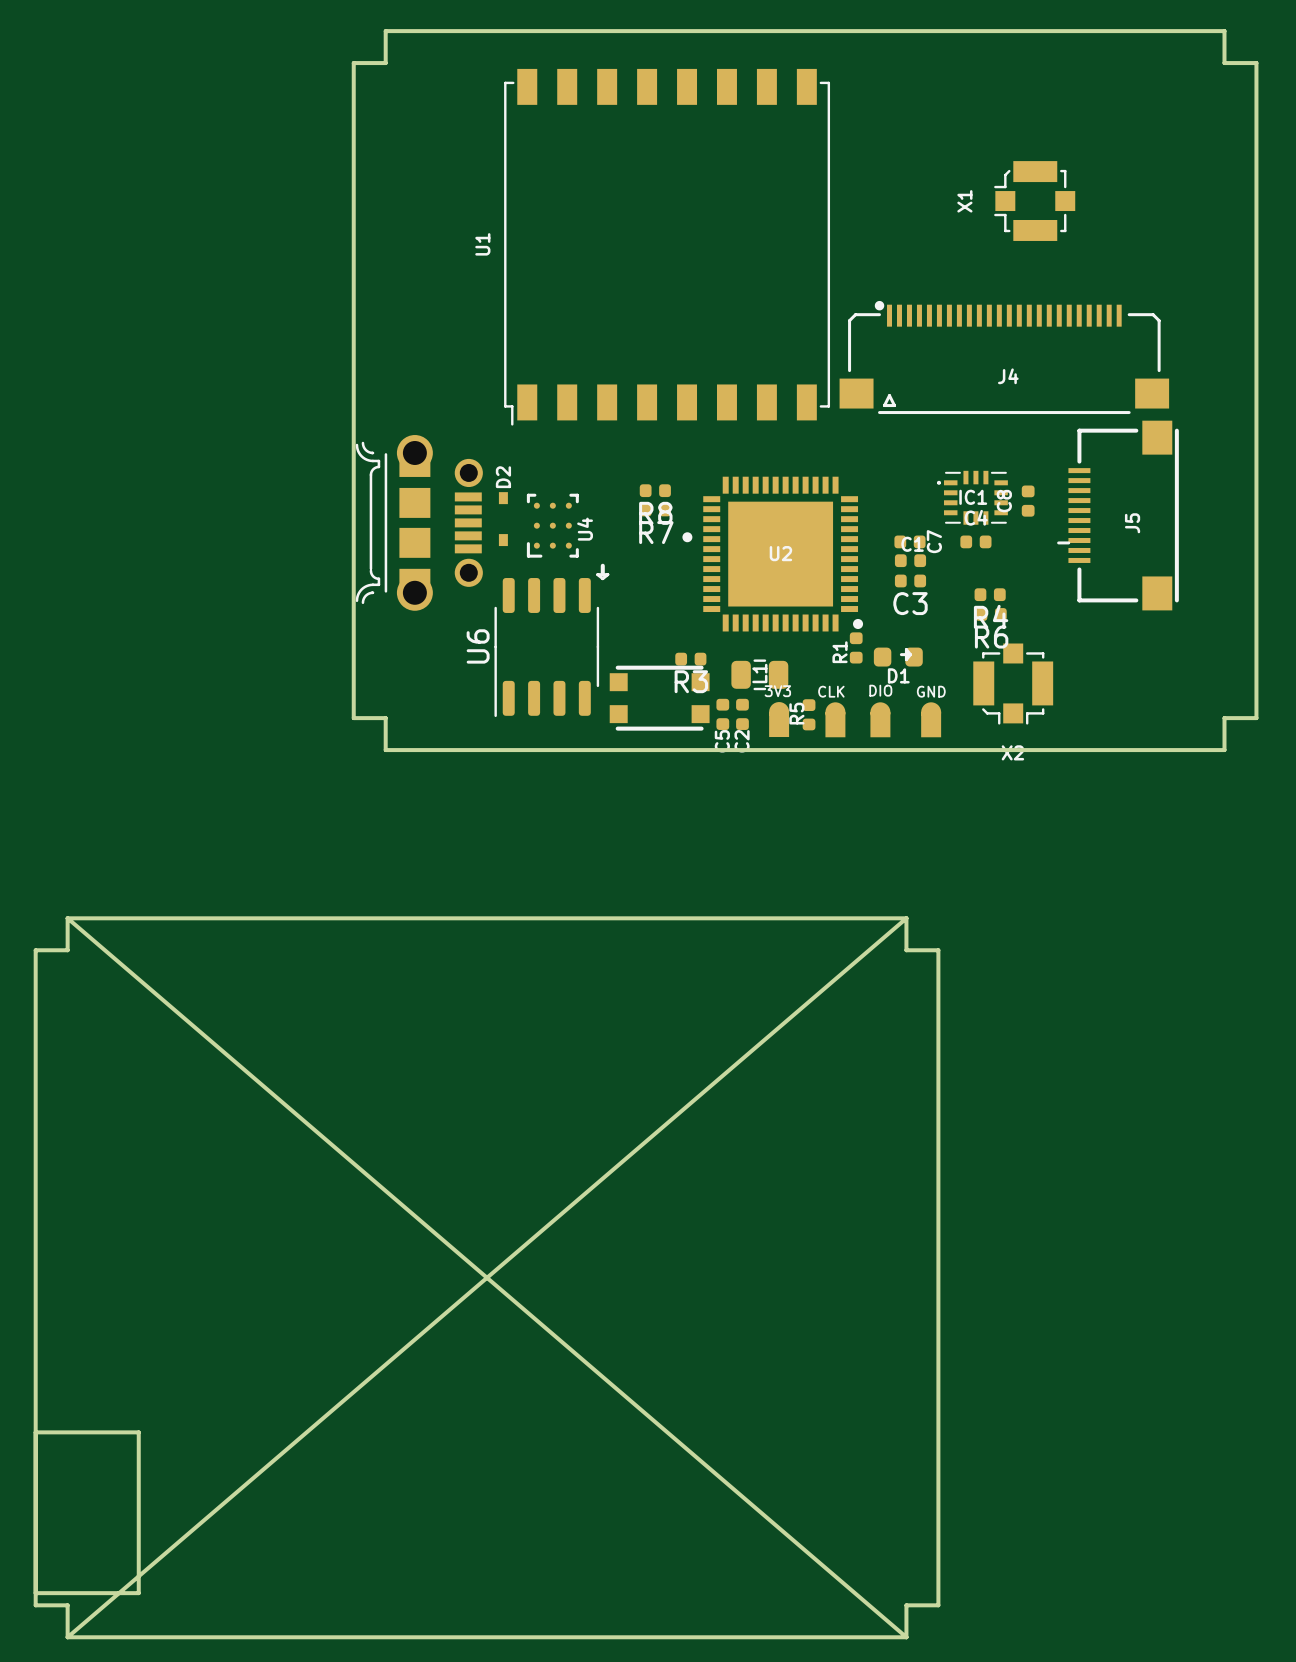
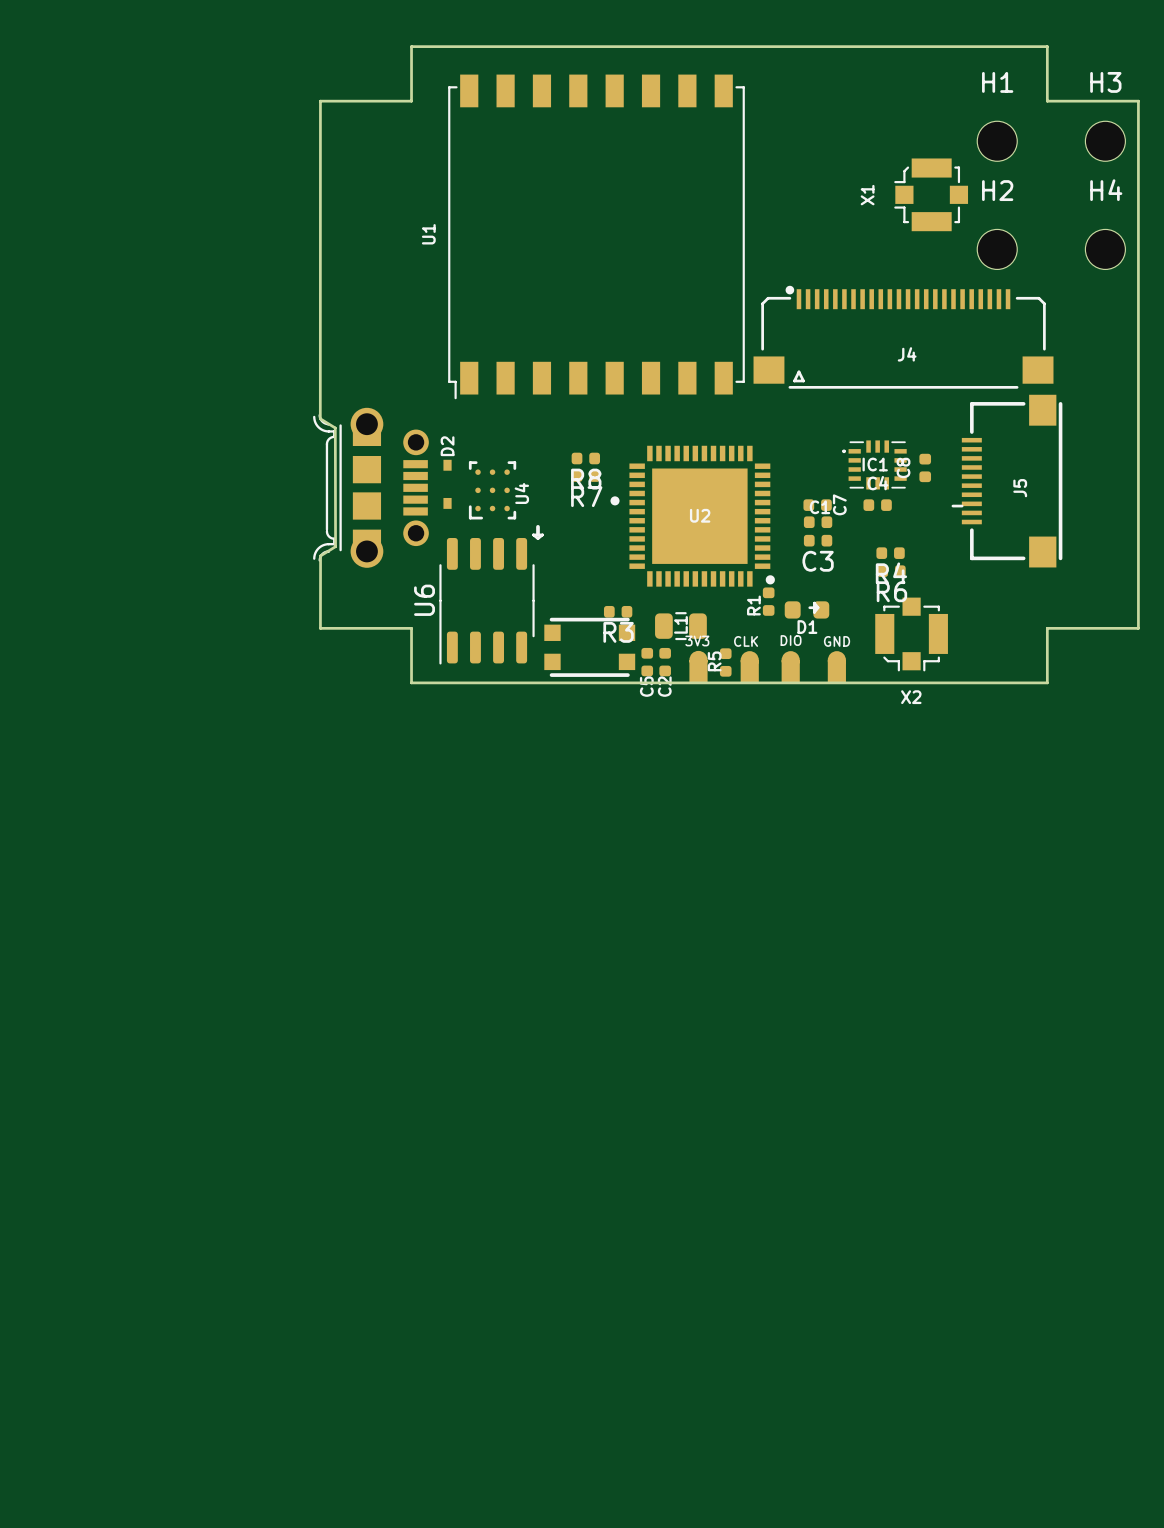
board edge: (385, 31) (385, 63) (353, 63) (353, 718) (385, 718) (385, 750) (1224, 750) (1224, 718) (1256, 718) (1256, 63) (1224, 63) (1224, 31) (385, 31) -> (411, 46) (411, 101) (320, 101) (320, 418) (335, 428) (335, 546) (320, 555) (320, 628) (411, 628) (411, 682) (1047, 682) (1047, 628) (1138, 628) (1138, 101) (1047, 101) (1047, 46) (411, 46)
H1: none -> (997, 141)
H3: none -> (1105, 141)
H2: none -> (997, 249)
H4: none -> (1105, 249)
board edge: (67, 918) (906, 1637) -> none
board edge: (67, 918) (67, 950) (35, 950) (35, 1605) (67, 1605) (67, 1637) -> none
board edge: (67, 918) (906, 918) -> none
board edge: (906, 918) (67, 1637) -> none
board edge: (906, 918) (906, 950) (938, 950) (938, 1605) (906, 1605) (906, 1637) -> none
board edge: (35, 1432) (138, 1432) (138, 1593) (35, 1593) -> none
board edge: (67, 1637) (906, 1637) -> none

